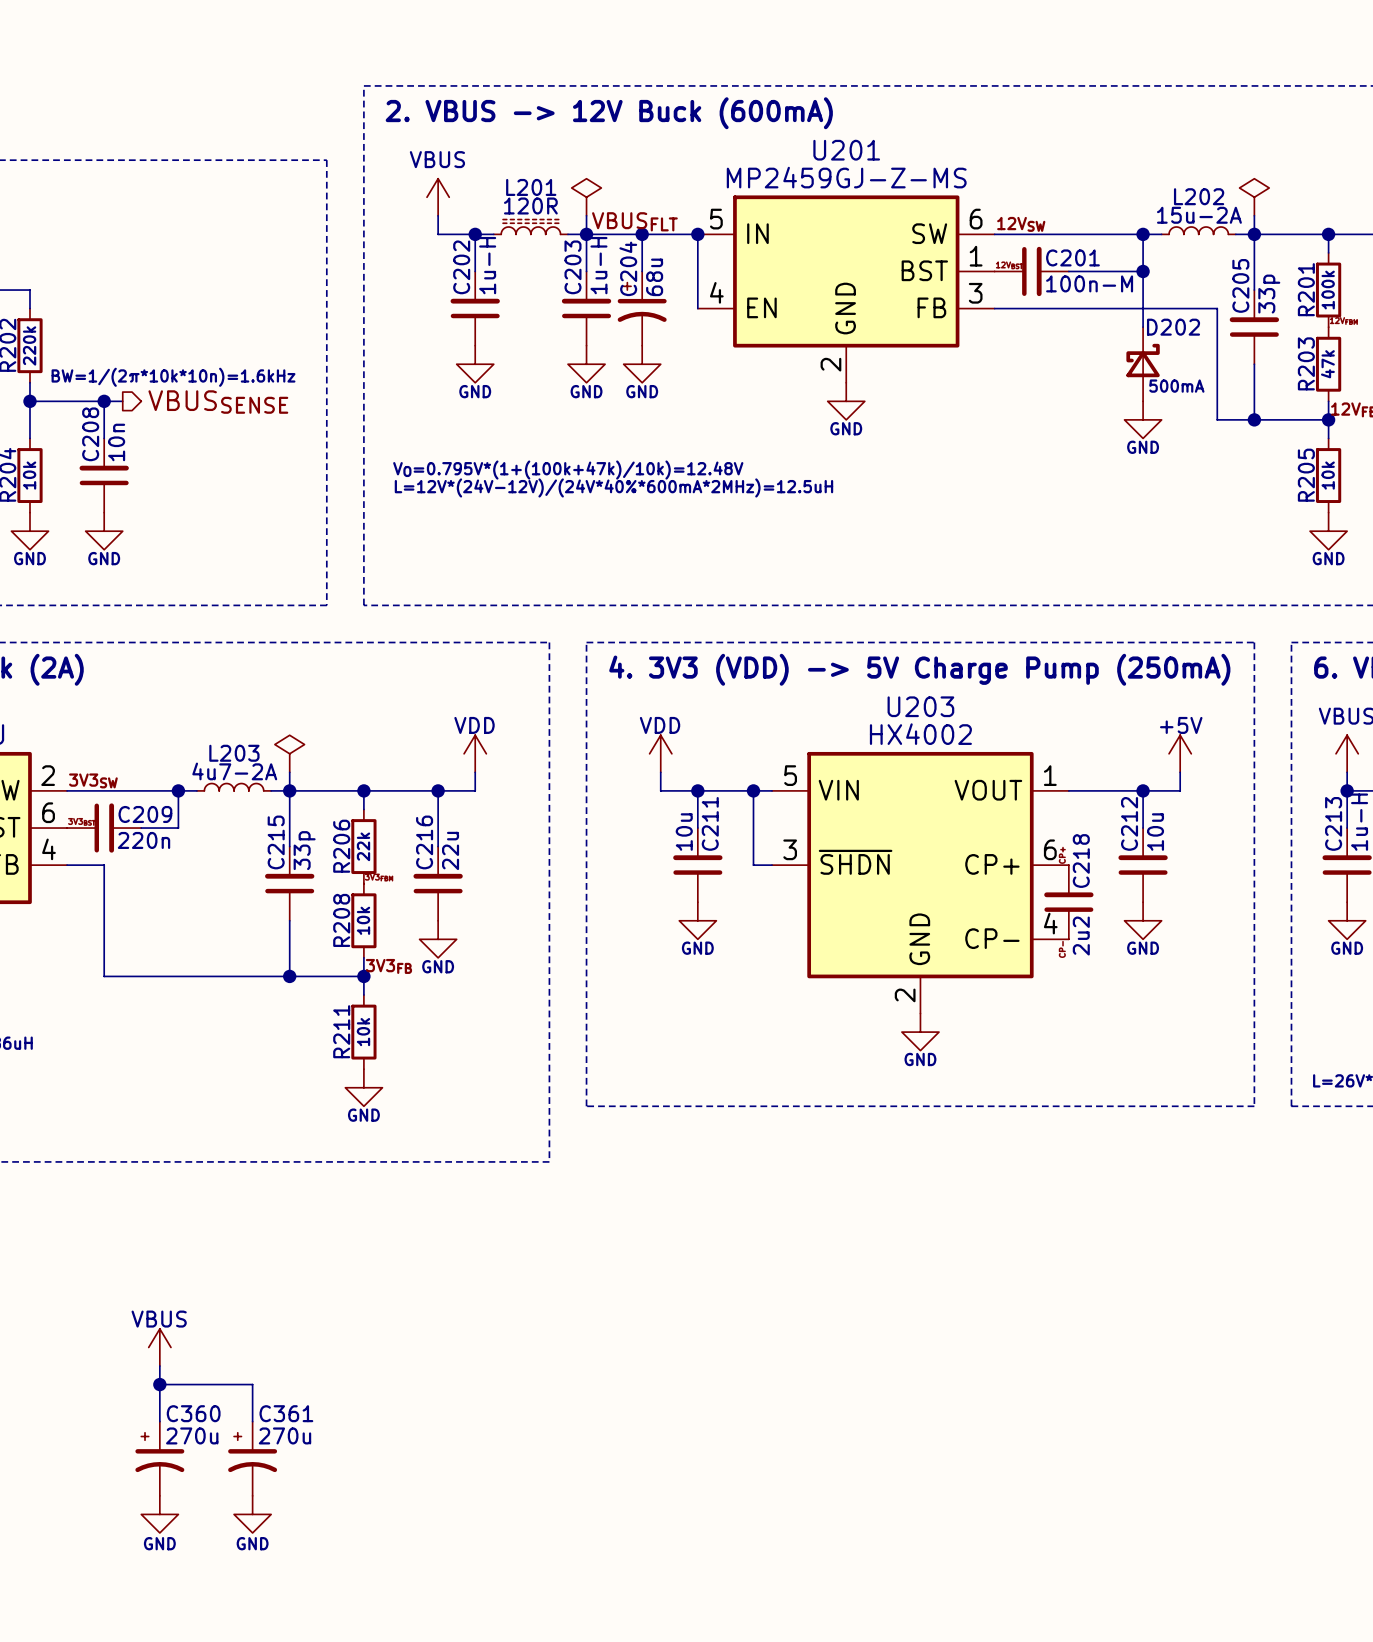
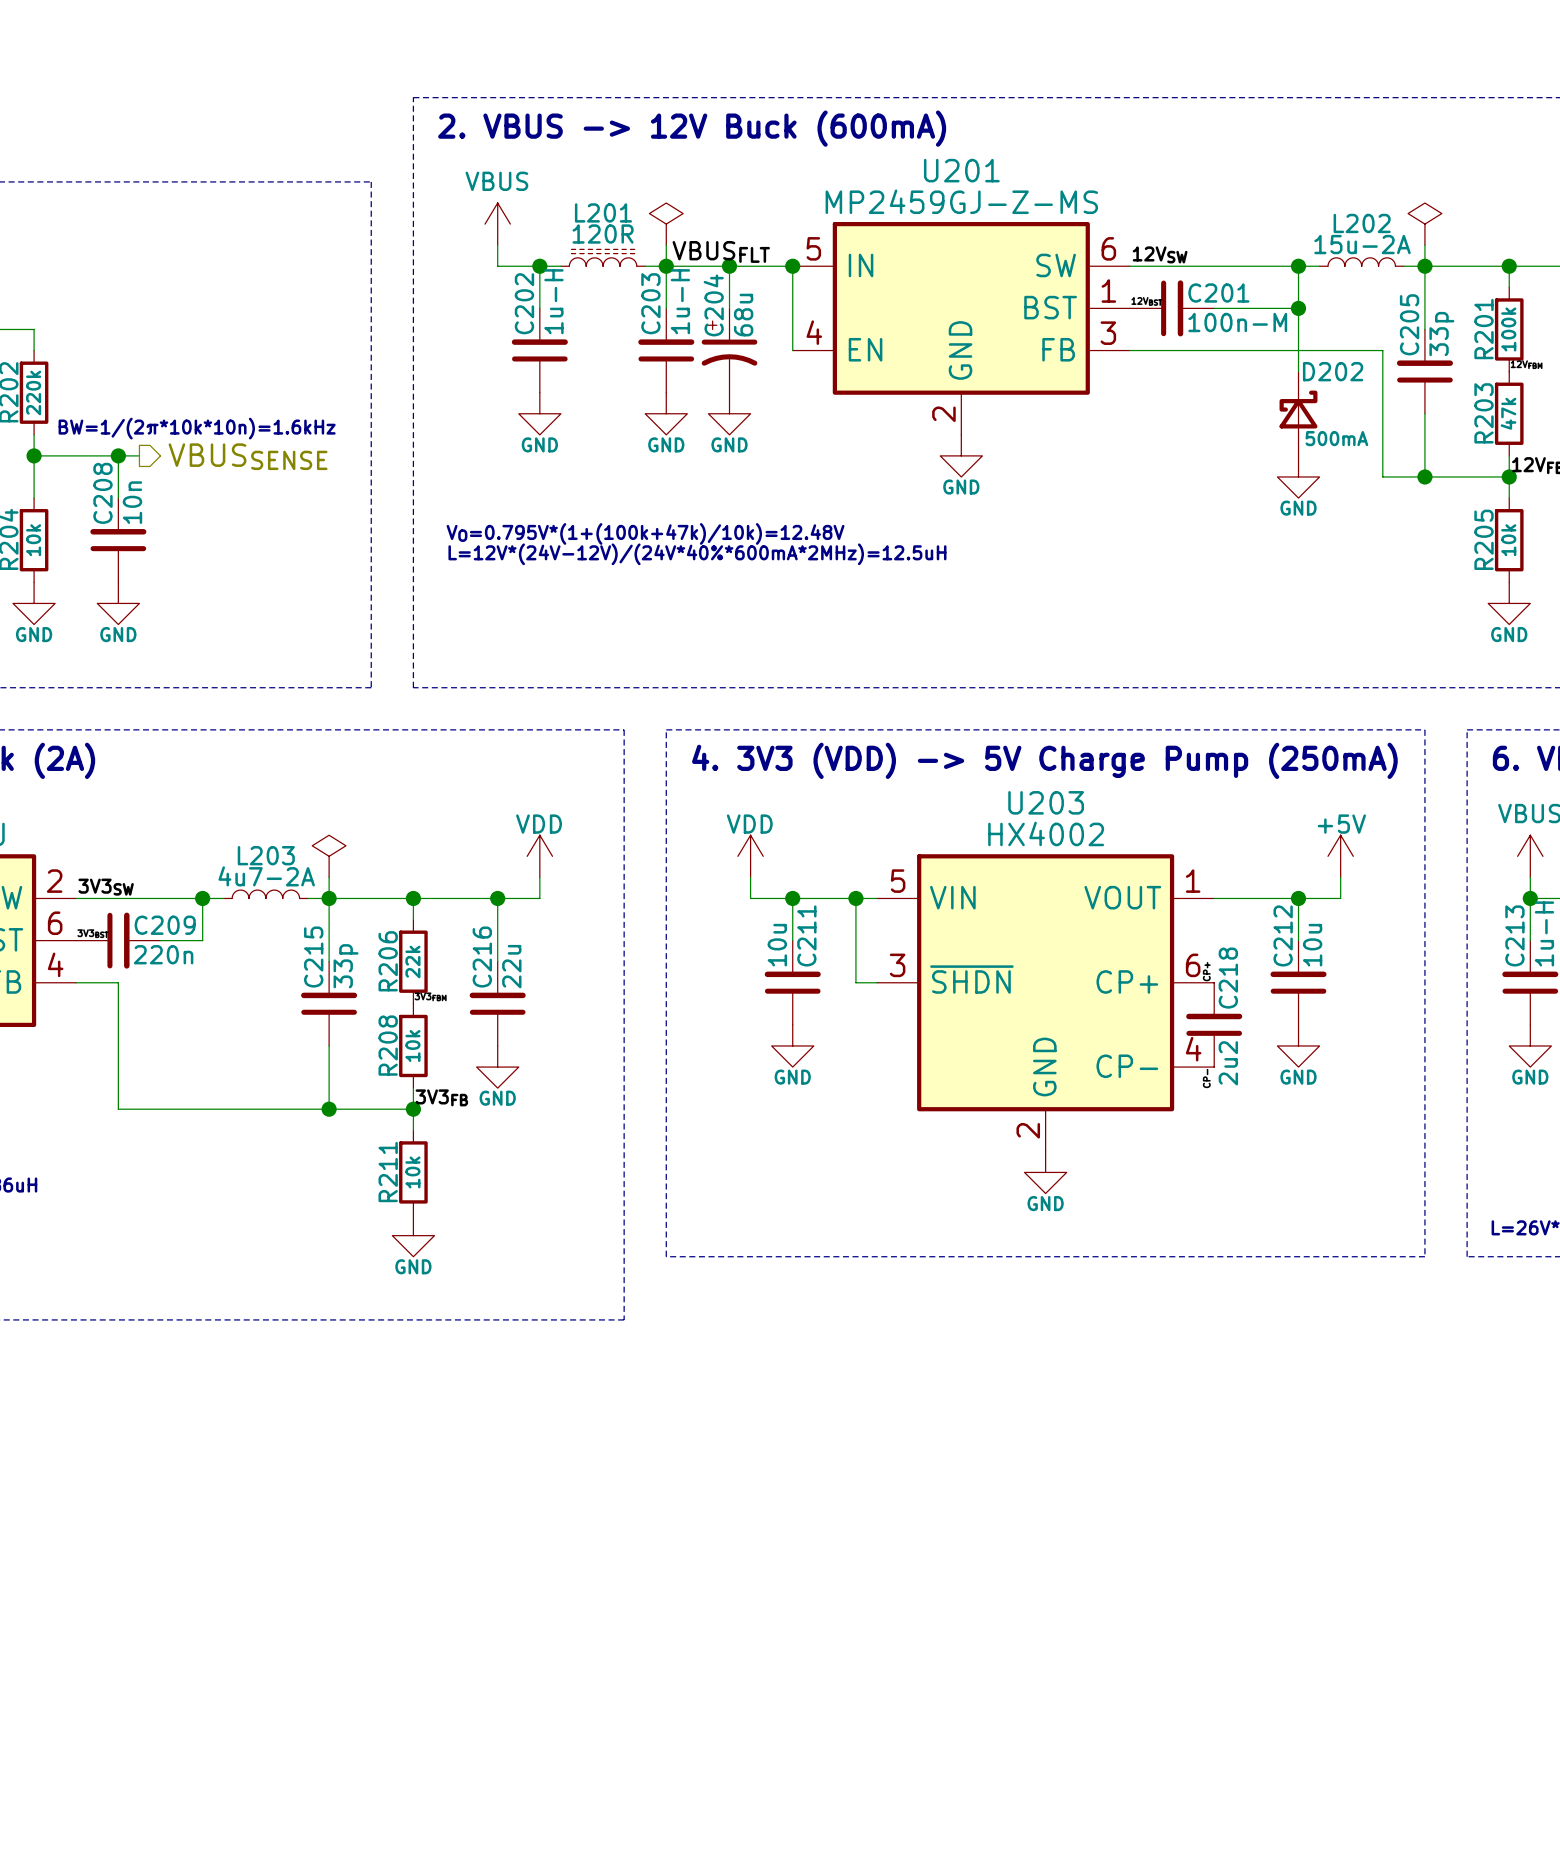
power symbol: VBUS (159, 1347) -> none
wire: (159, 1366) (159, 1421) -> none
wire: (159, 1384) (252, 1384) (252, 1421) -> none
junction: (159, 1384) -> none
C360: 270u (159, 1458) -> none
C361: 270u (252, 1458) -> none
power symbol: GND (159, 1514) -> none
power symbol: GND (252, 1514) -> none

